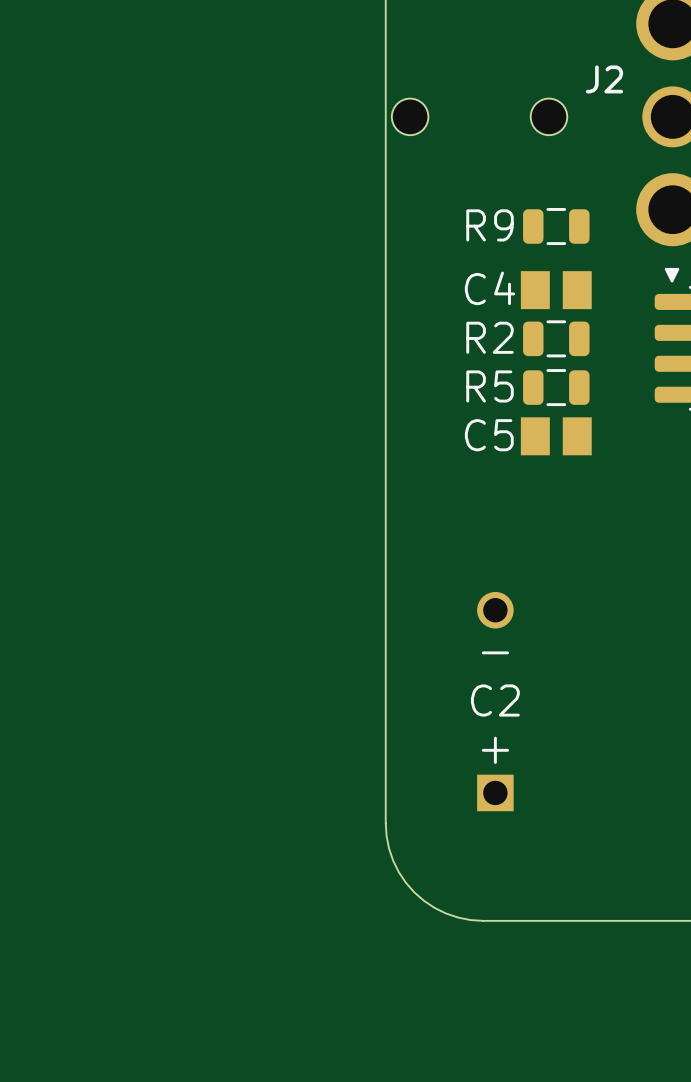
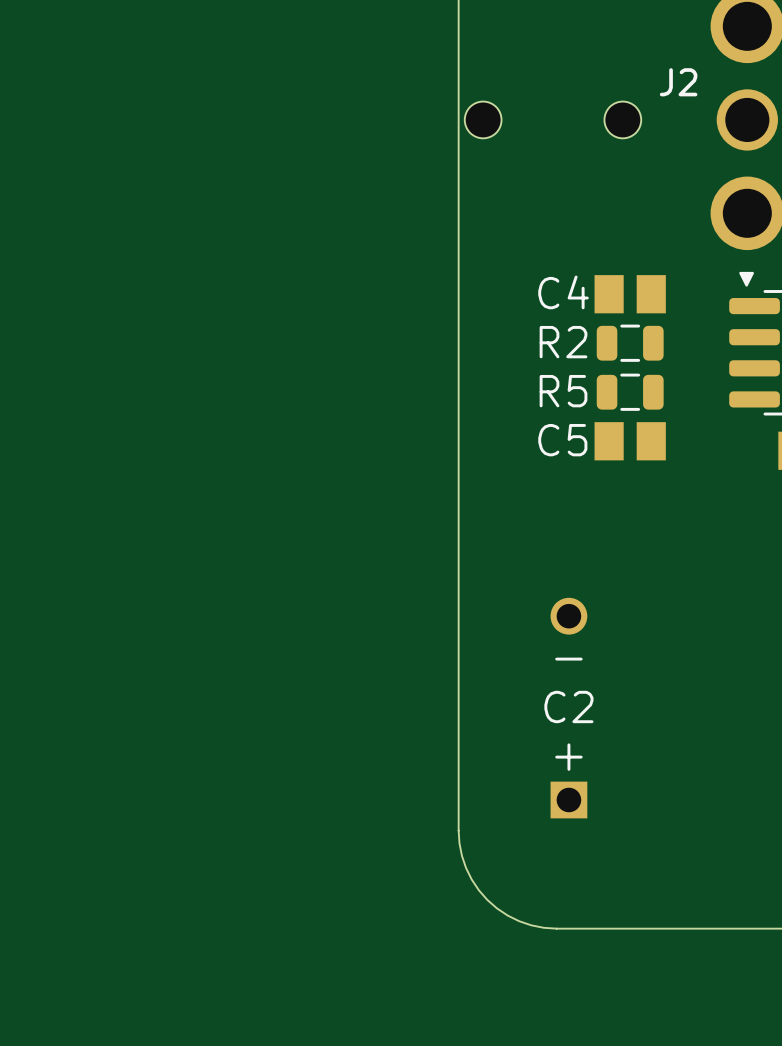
R9: (556, 226) -> none

